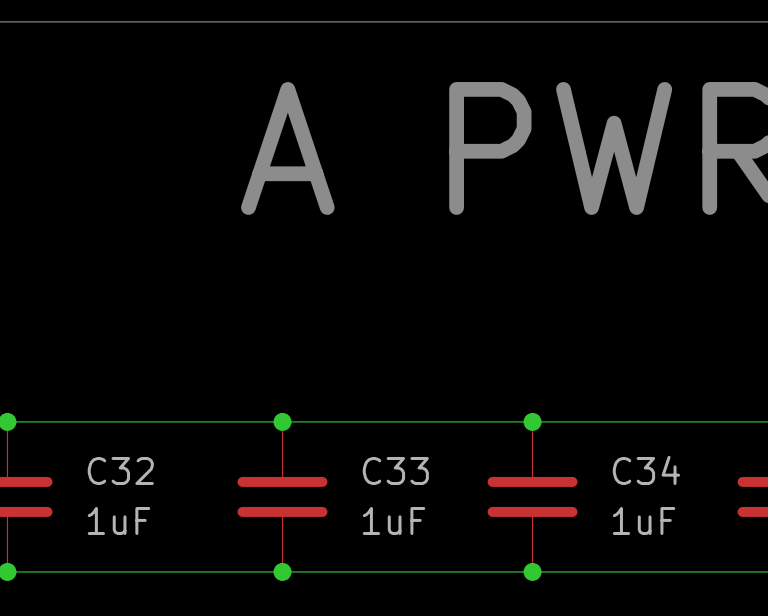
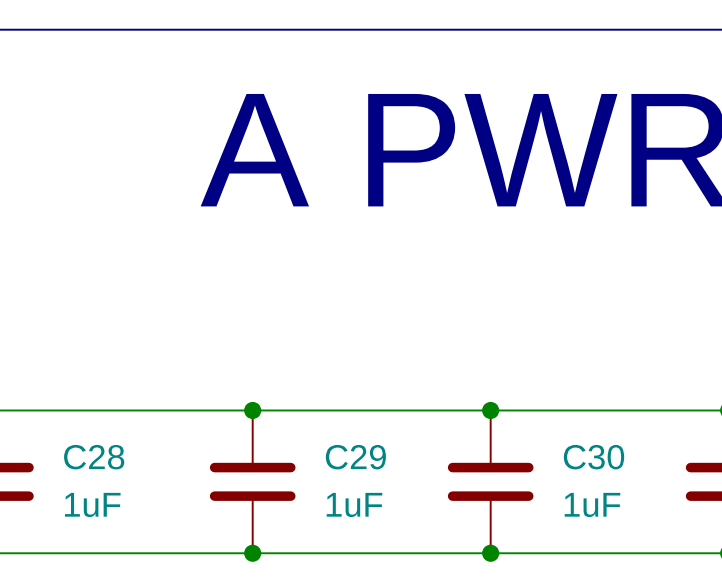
C32 name: C32 (120, 470) -> C28 (94, 457)
C33 name: C33 (395, 470) -> C29 (355, 457)
C34 name: C34 (646, 470) -> C30 (594, 457)

